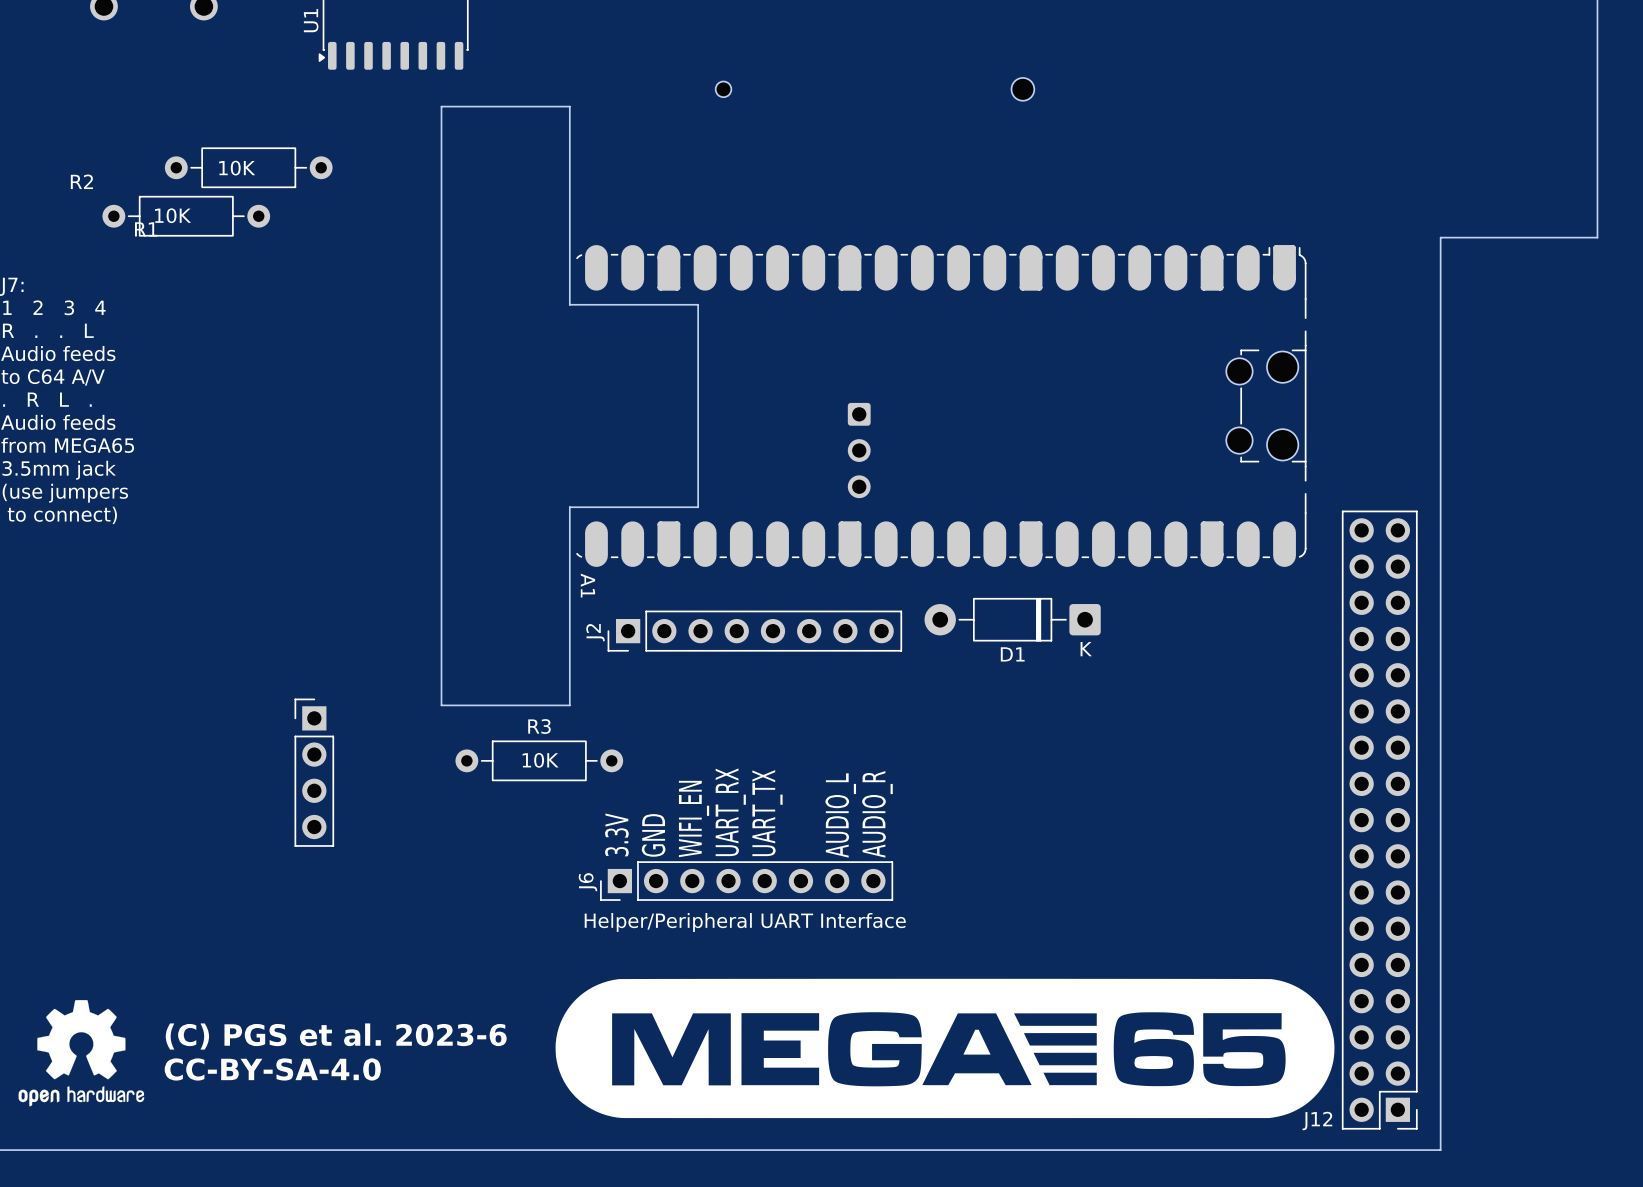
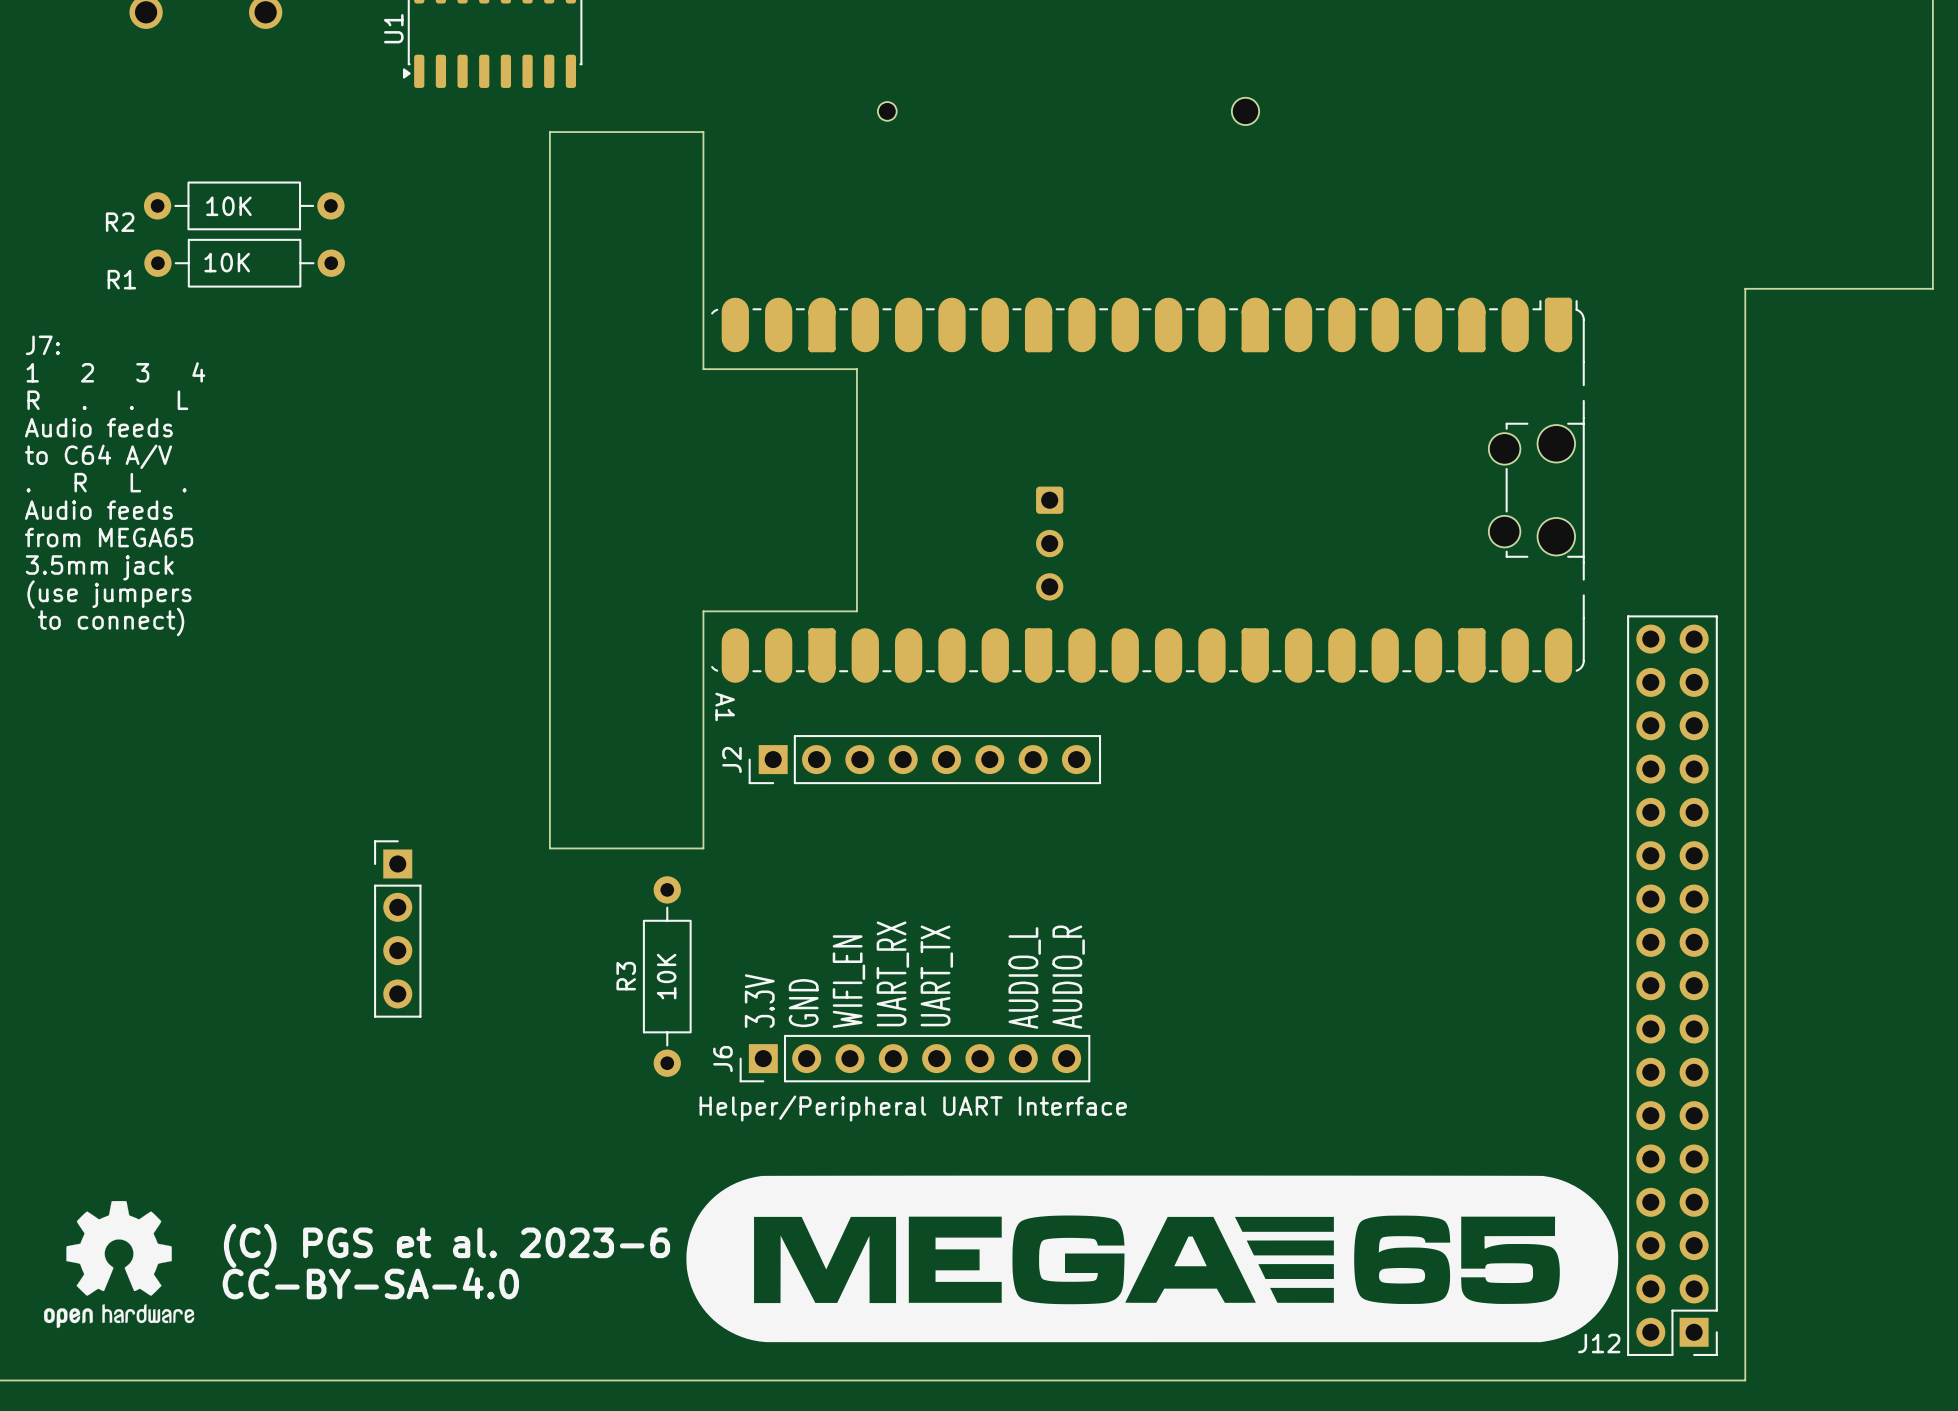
R1 position: (248, 167) -> (244, 205)
D1: (1012, 619) -> none
R3 name position: R3 (539, 726) -> R3 (626, 976)
R3 rotation: 0° (539, 760) -> 90° clockwise (667, 976)

